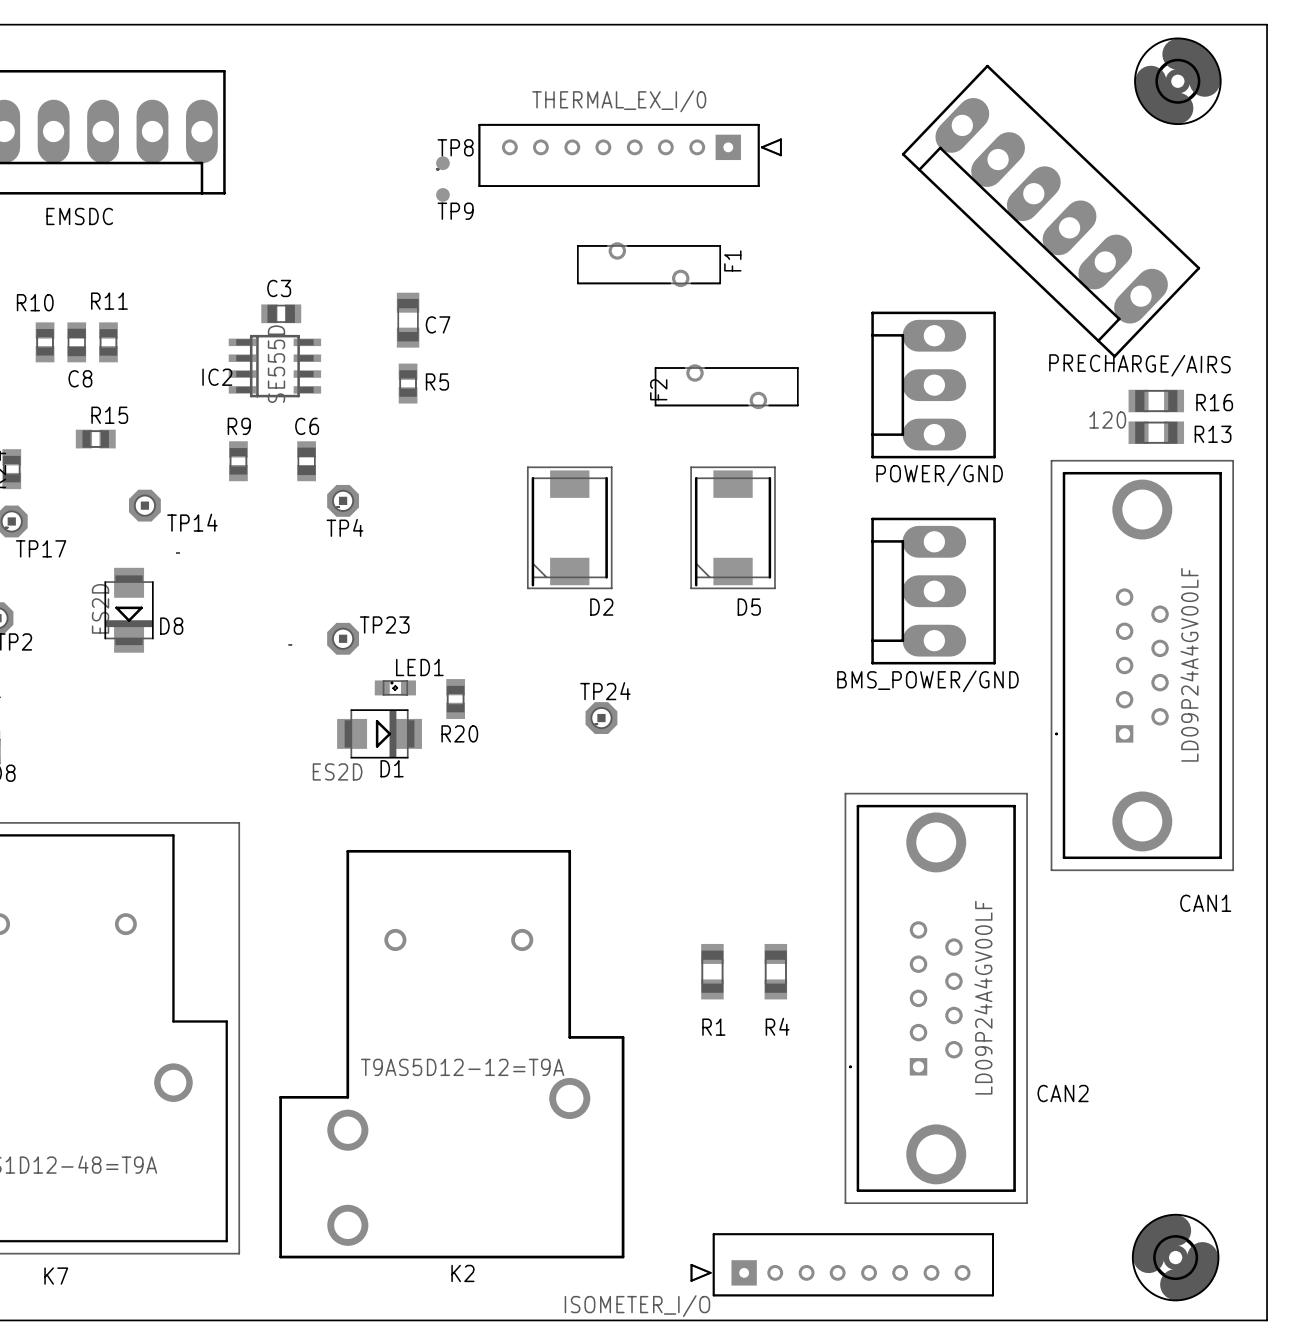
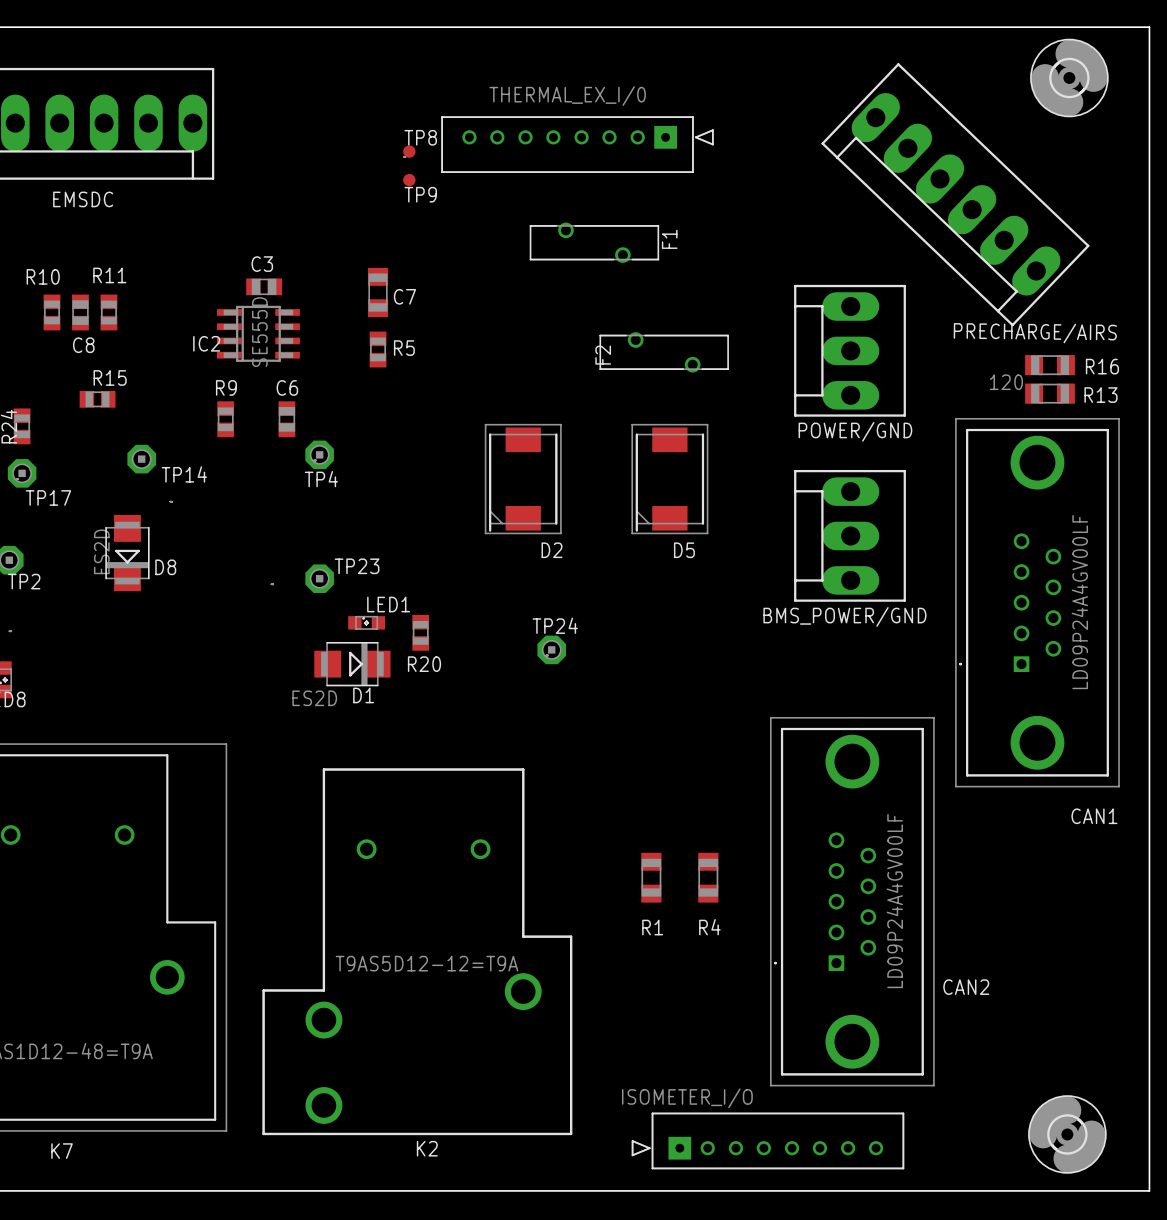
ISOMETER_I/O name position: ISOMETER_I/O (637, 1306) -> ISOMETER_I/O (687, 1098)

